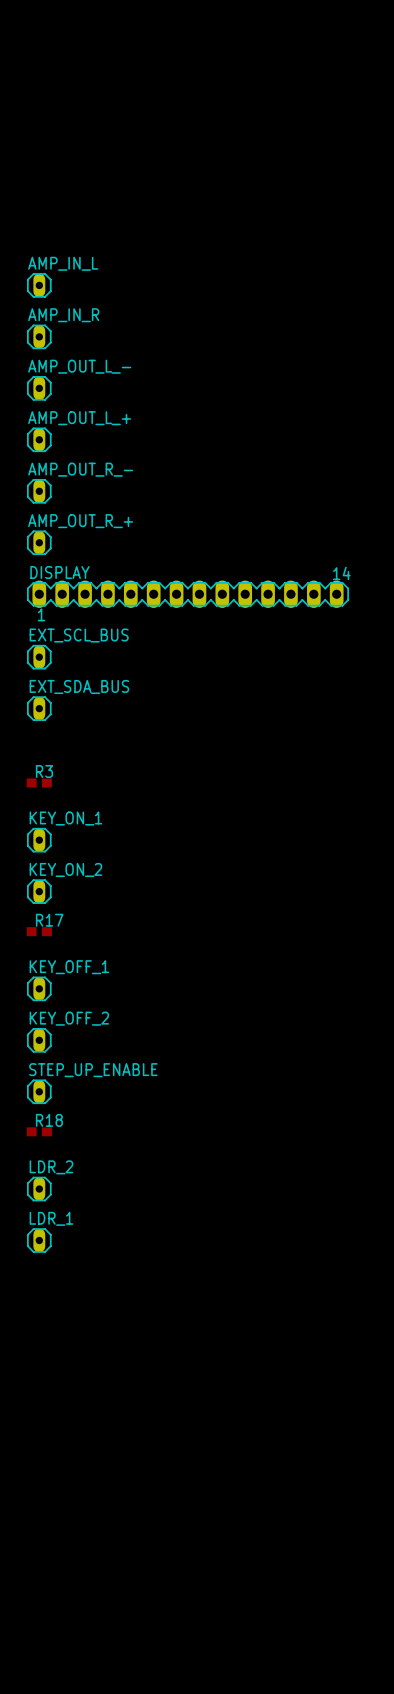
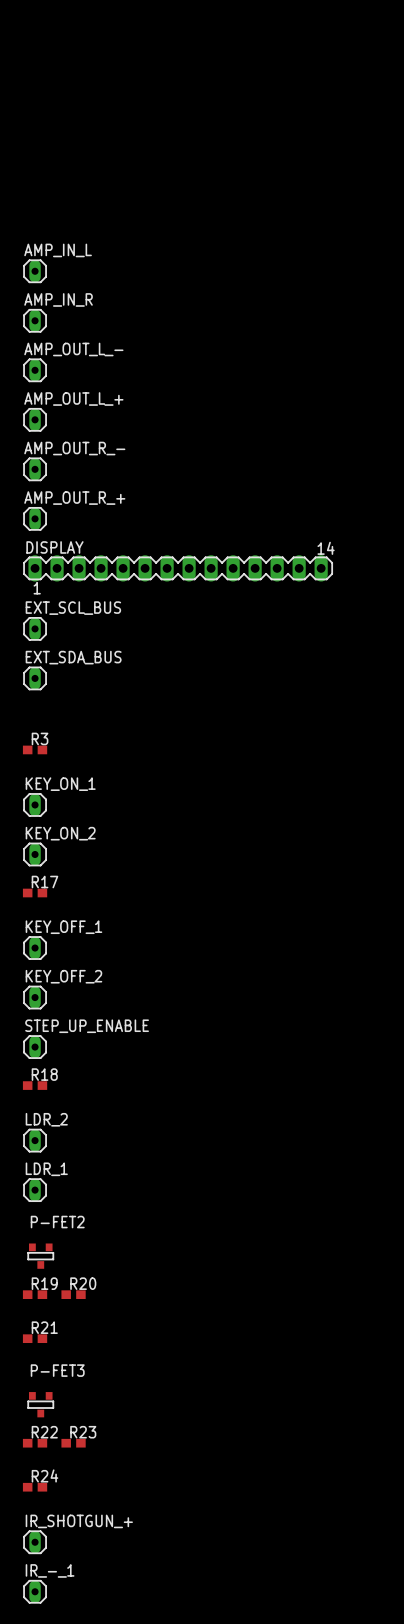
P-FET2: none -> (40, 1256)
R19: none -> (35, 1294)
R20: none -> (73, 1294)
R21: none -> (35, 1338)
P-FET3: none -> (40, 1404)
R22: none -> (35, 1443)
R23: none -> (73, 1443)
R24: none -> (35, 1487)
IR_SHOTGUN_+: none -> (35, 1542)
IR_-_1: none -> (35, 1591)

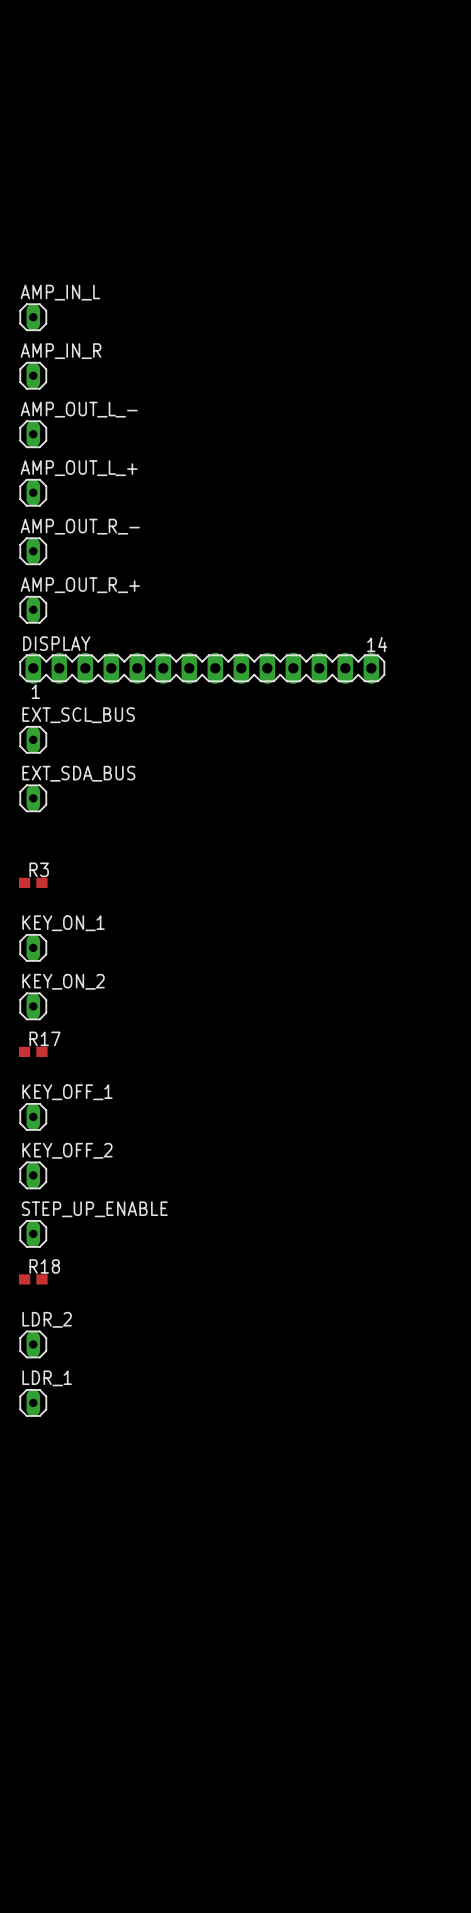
P-FET2: (40, 1256) -> none
R19: (35, 1294) -> none
R20: (73, 1294) -> none
R21: (35, 1338) -> none
P-FET3: (40, 1404) -> none
R22: (35, 1443) -> none
R23: (73, 1443) -> none
R24: (35, 1487) -> none
IR_SHOTGUN_+: (35, 1542) -> none
IR_-_1: (35, 1591) -> none

